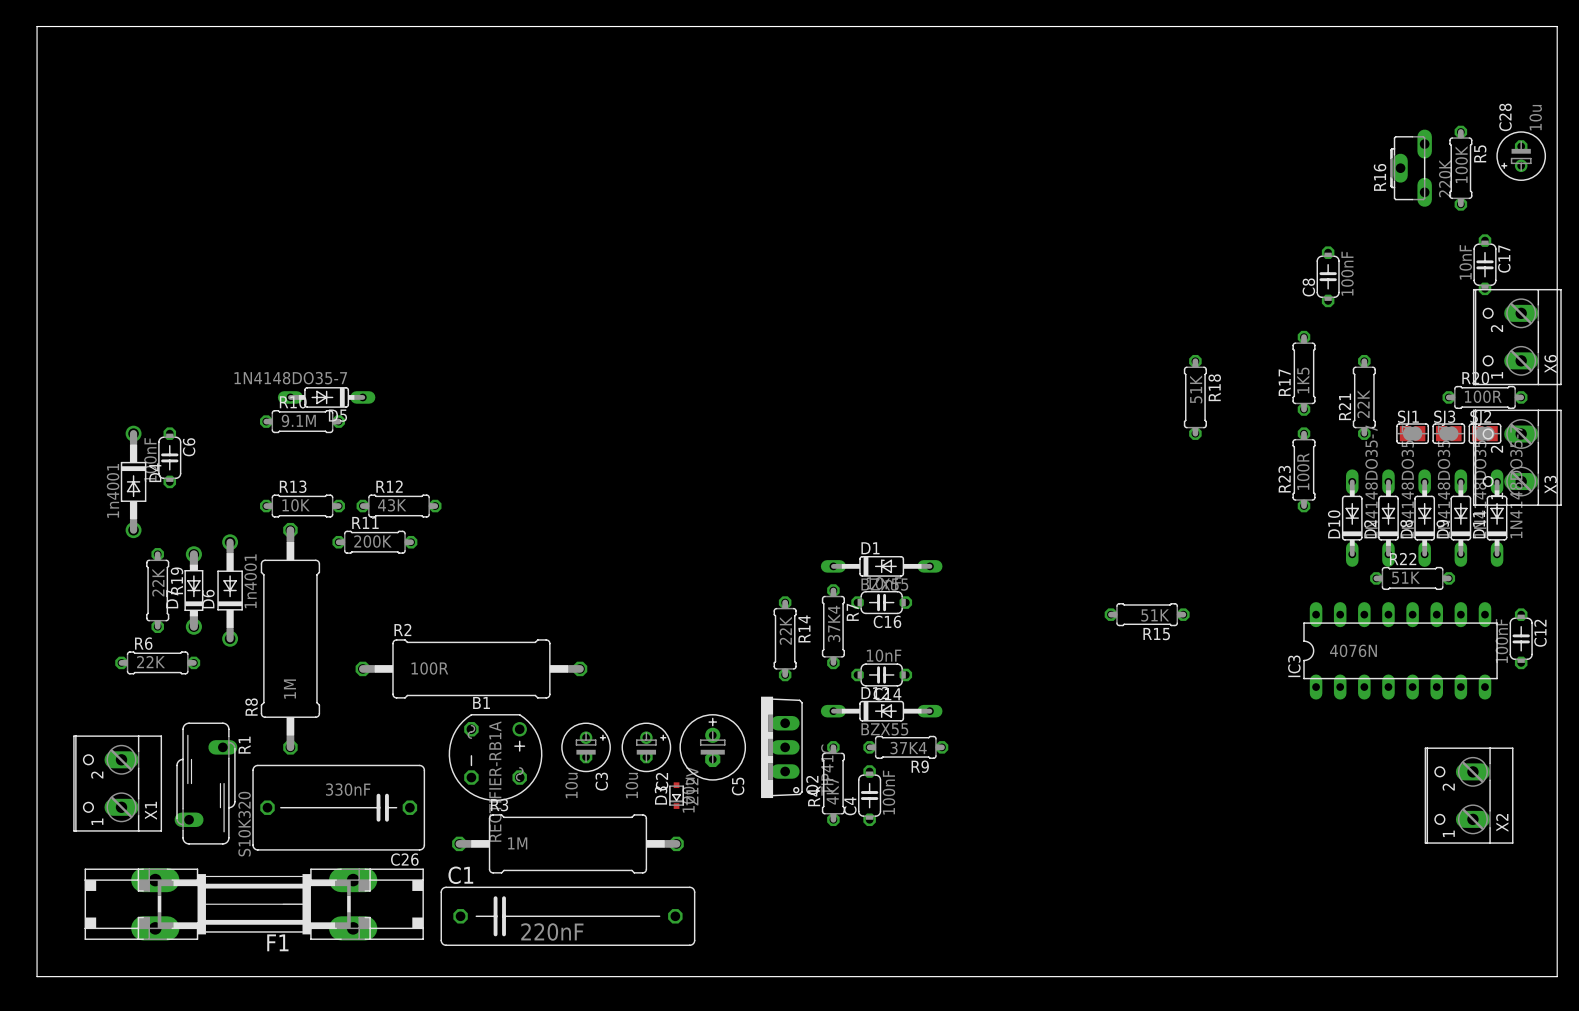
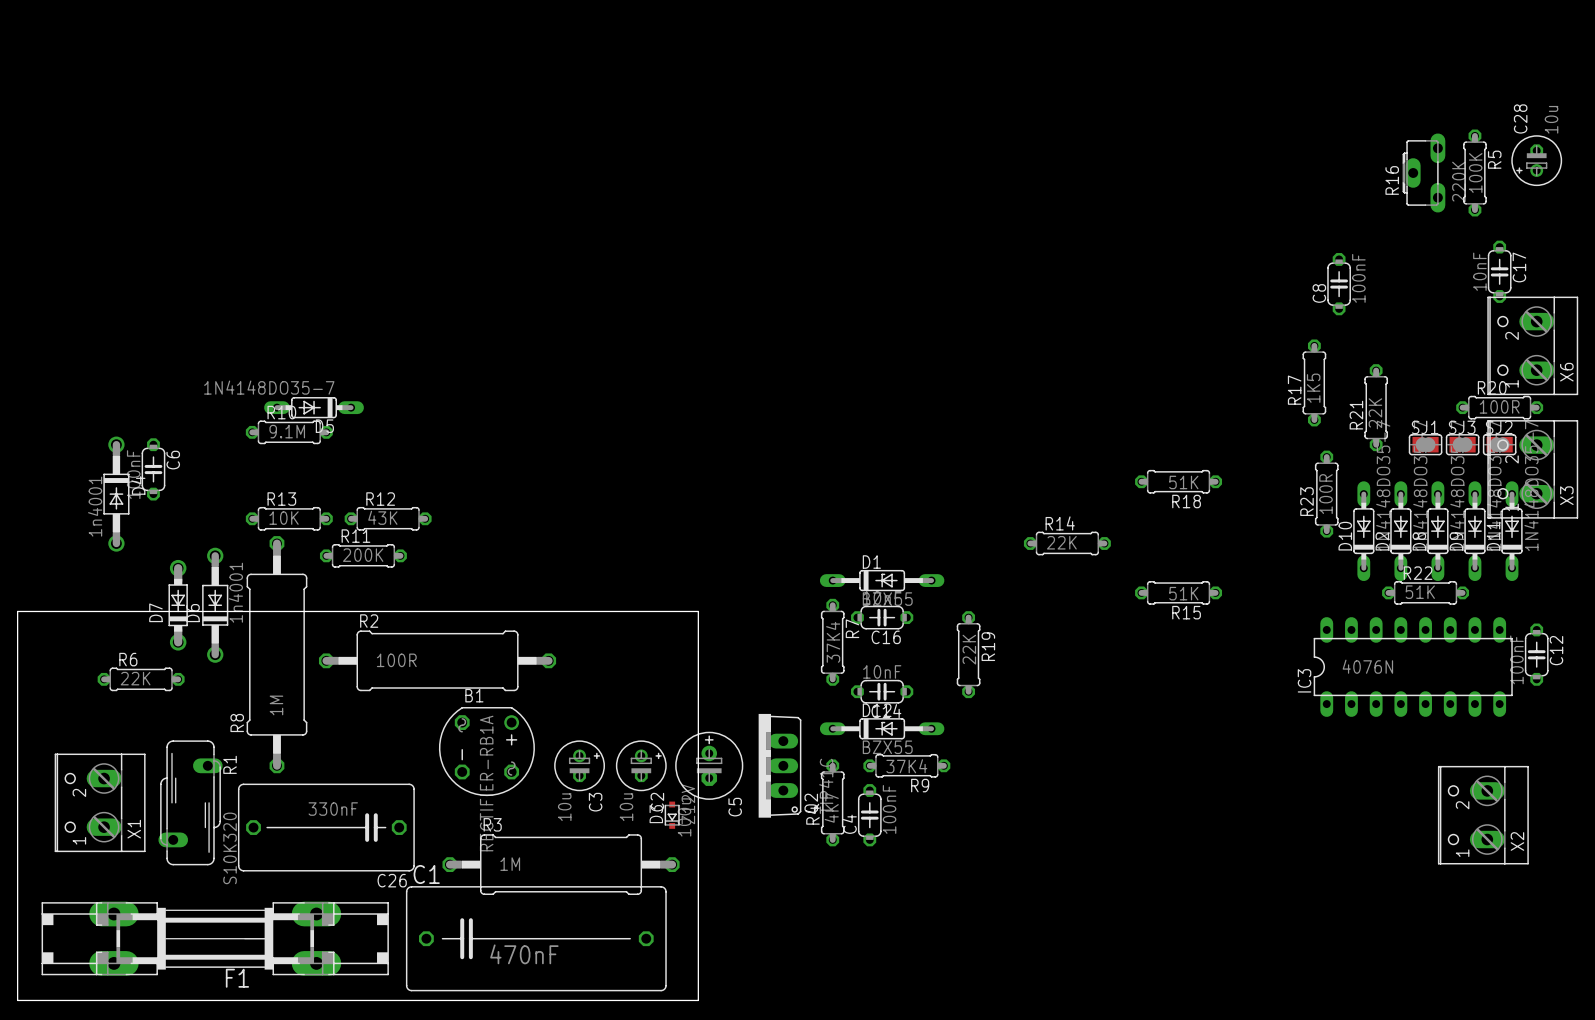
R18 rotation: 0° (1195, 397) -> 90° clockwise (1178, 481)
R18 position: (1195, 397) -> (1178, 481)
R23 position: (1304, 469) -> (1326, 494)
R19 position: (157, 590) -> (968, 654)
board edge: (37, 596) (37, 26) (1557, 26) (1557, 976) (702, 976) -> (17, 611) (698, 611) (698, 1000)
R15 position: (1147, 614) -> (1178, 592)
R14 name position: R14 (804, 628) -> R14 (1060, 523)
R14 rotation: 0° (785, 638) -> 90° clockwise (1067, 543)
R14 position: (785, 638) -> (1067, 543)
R2 position: (471, 668) -> (437, 660)
B1 position: (495, 757) -> (486, 751)
C1 name position: C1 (460, 875) -> C1 (426, 874)
C1 footprint: [440, 886, 696, 946] -> [405, 886, 667, 992]
F1 position: (254, 904) -> (215, 938)
C1 value: 220nF (552, 931) -> 470nF (524, 954)

